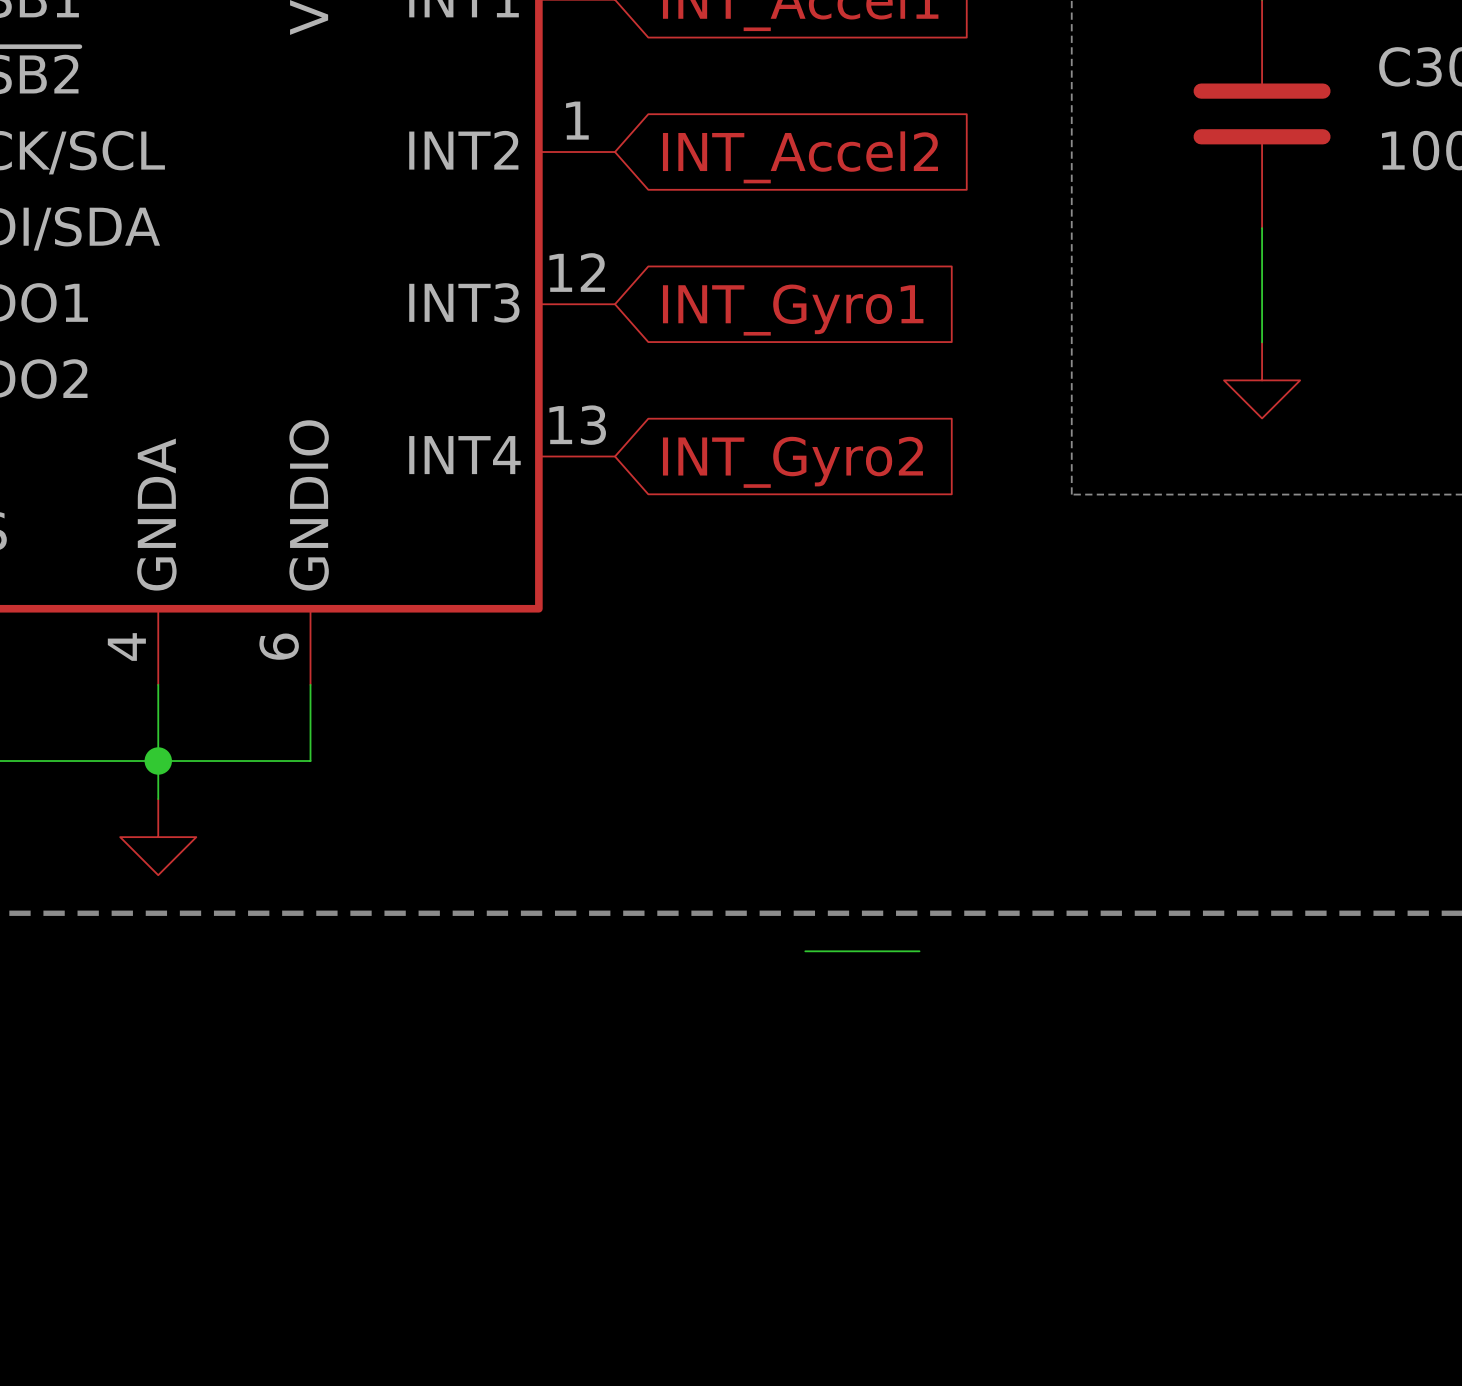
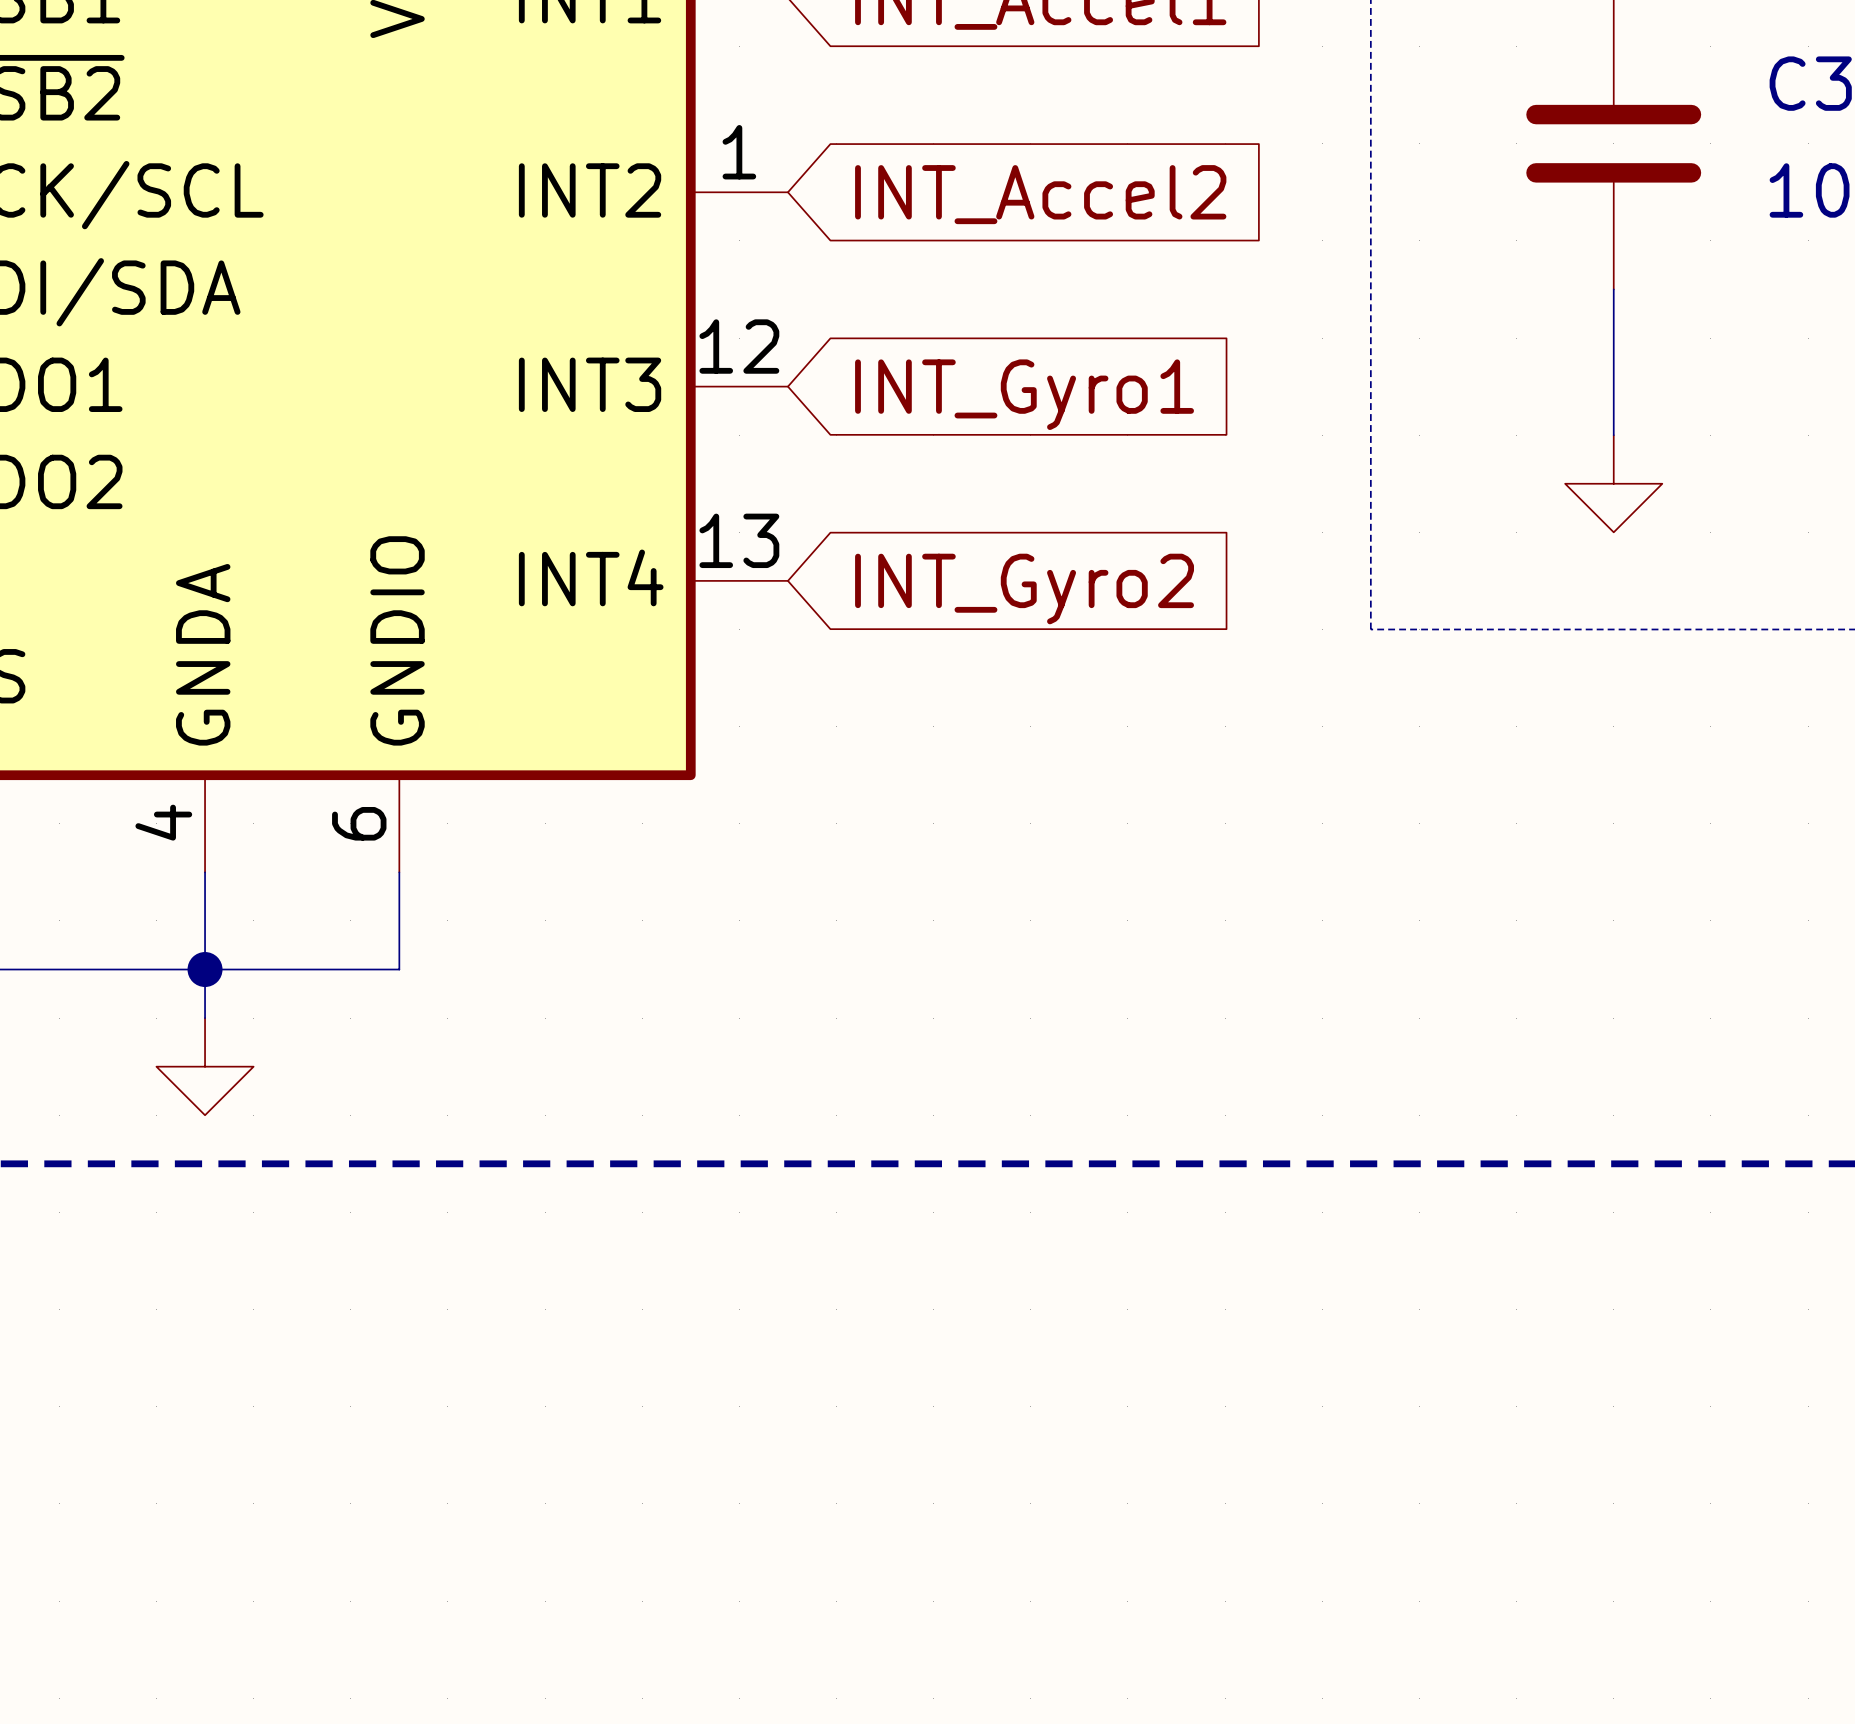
wire: (805, 951) (919, 951) -> none

